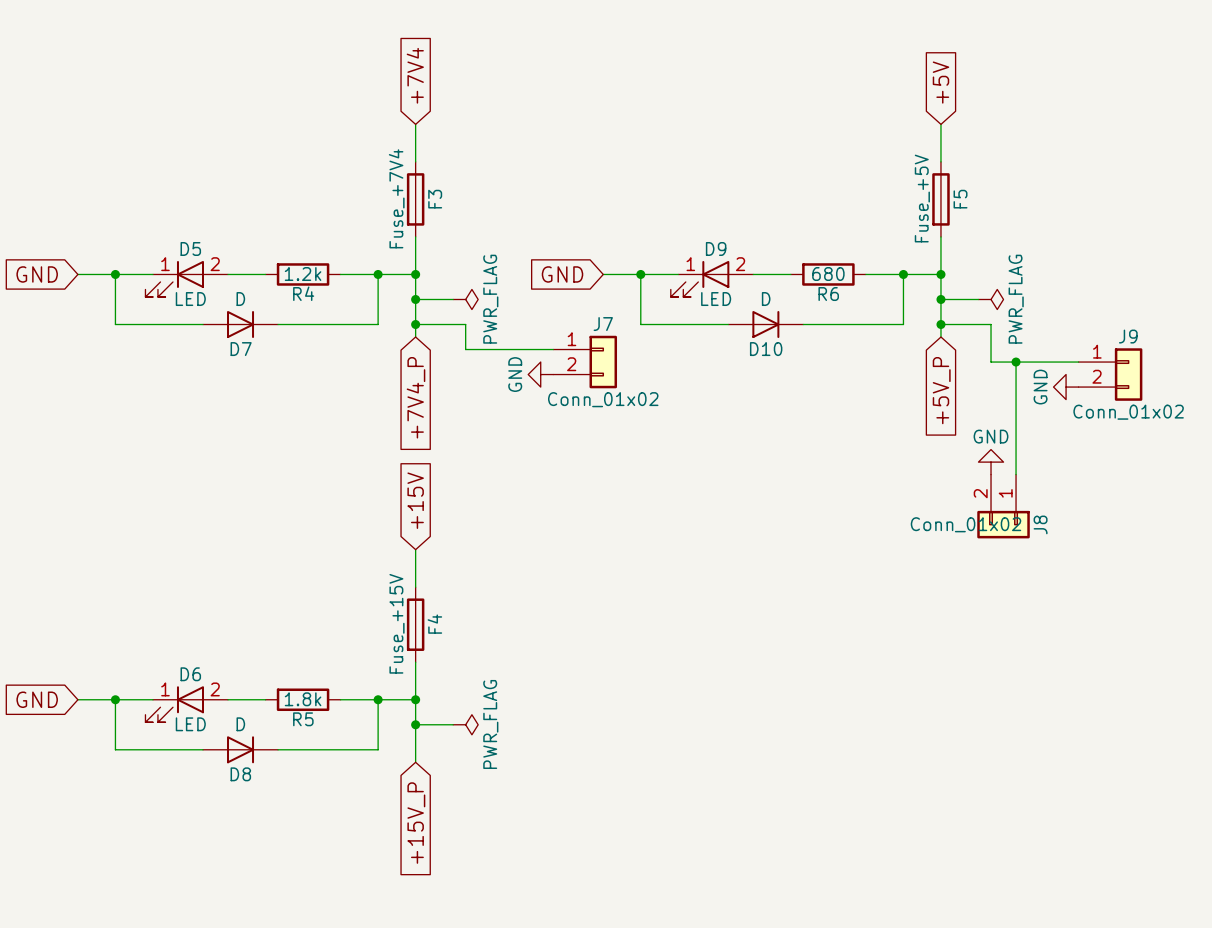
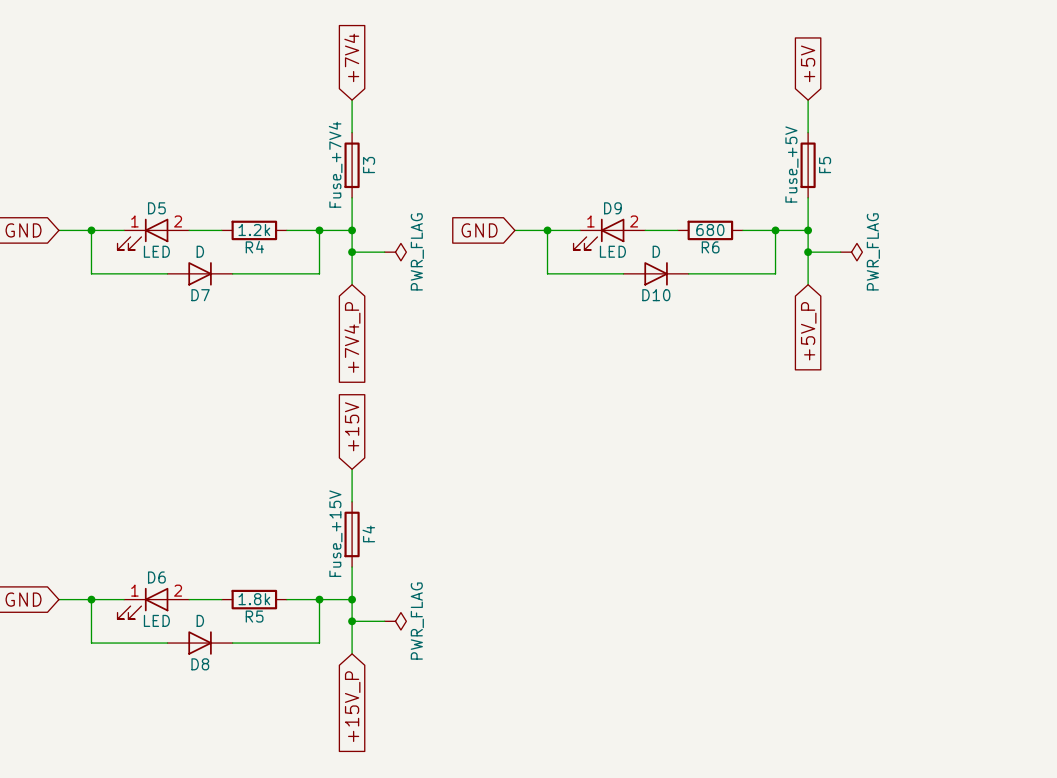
wire: (415, 324) (465, 324) (465, 349) (553, 349) -> none
junction: (415, 324) -> none
wire: (940, 324) (991, 324) (991, 362) (1078, 362) -> none
junction: (940, 324) -> none
J7: Conn_01x02 (585, 362) -> none
wire: (1016, 362) (1016, 474) -> none
junction: (1016, 362) -> none
power symbol: GND (540, 374) -> none
J9: Conn_01x02 (1110, 374) -> none
power symbol: GND (1066, 387) -> none
power symbol: GND (991, 462) -> none
J8: Conn_01x02 (1003, 506) -> none

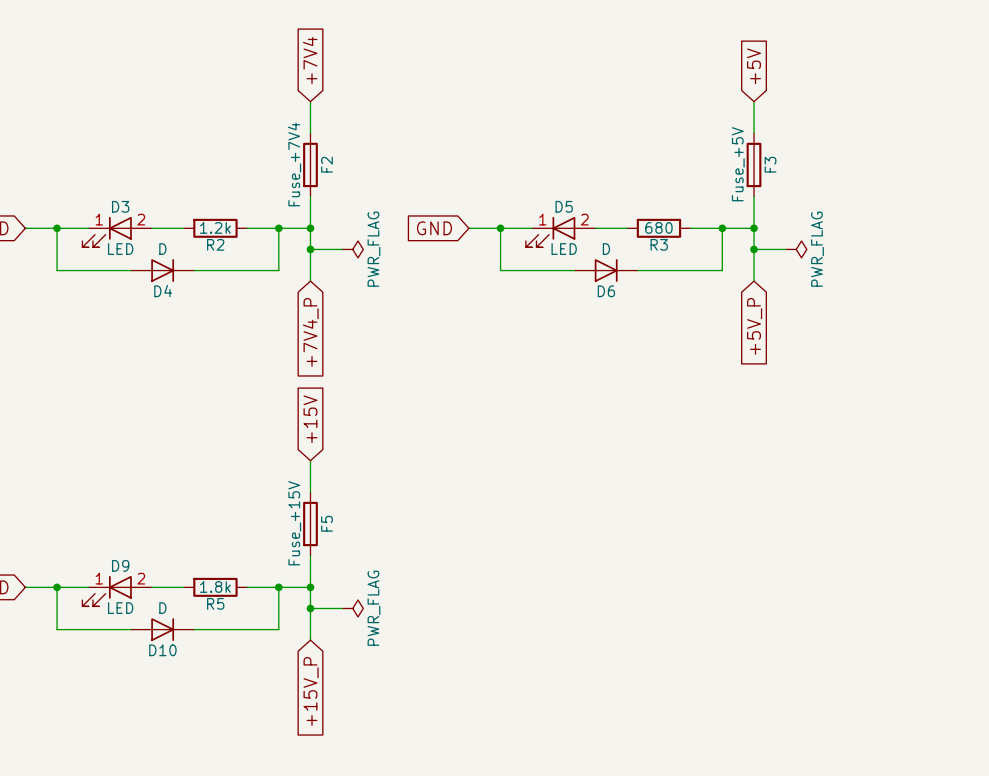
F3 name: F3 (369, 165) -> F2 (326, 164)
F5 name: F5 (825, 165) -> F3 (770, 164)
D5 name: D5 (156, 208) -> D3 (120, 206)
D9 name: D9 (612, 208) -> D5 (564, 206)
R4 name: R4 (254, 247) -> R2 (215, 244)
R6 name: R6 (710, 247) -> R3 (659, 244)
D7 name: D7 (200, 295) -> D4 (163, 291)
D10 name: D10 (656, 295) -> D6 (606, 291)
F4 name: F4 (368, 533) -> F5 (326, 523)
D6 name: D6 (156, 577) -> D9 (120, 565)
D8 name: D8 (200, 664) -> D10 (162, 650)

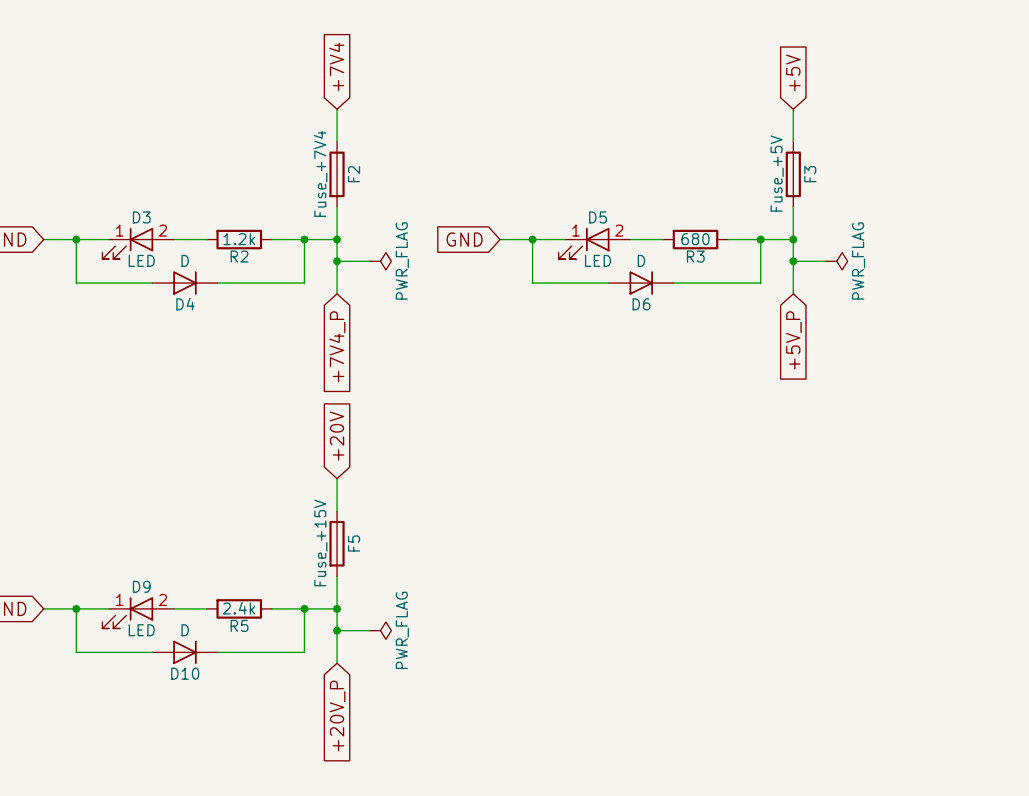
global label: +15V (310, 419) -> +20V (337, 436)
R5 value: 1.8k (215, 586) -> 2.4k (239, 608)
global label: +15V_P (311, 691) -> +20V_P (337, 716)

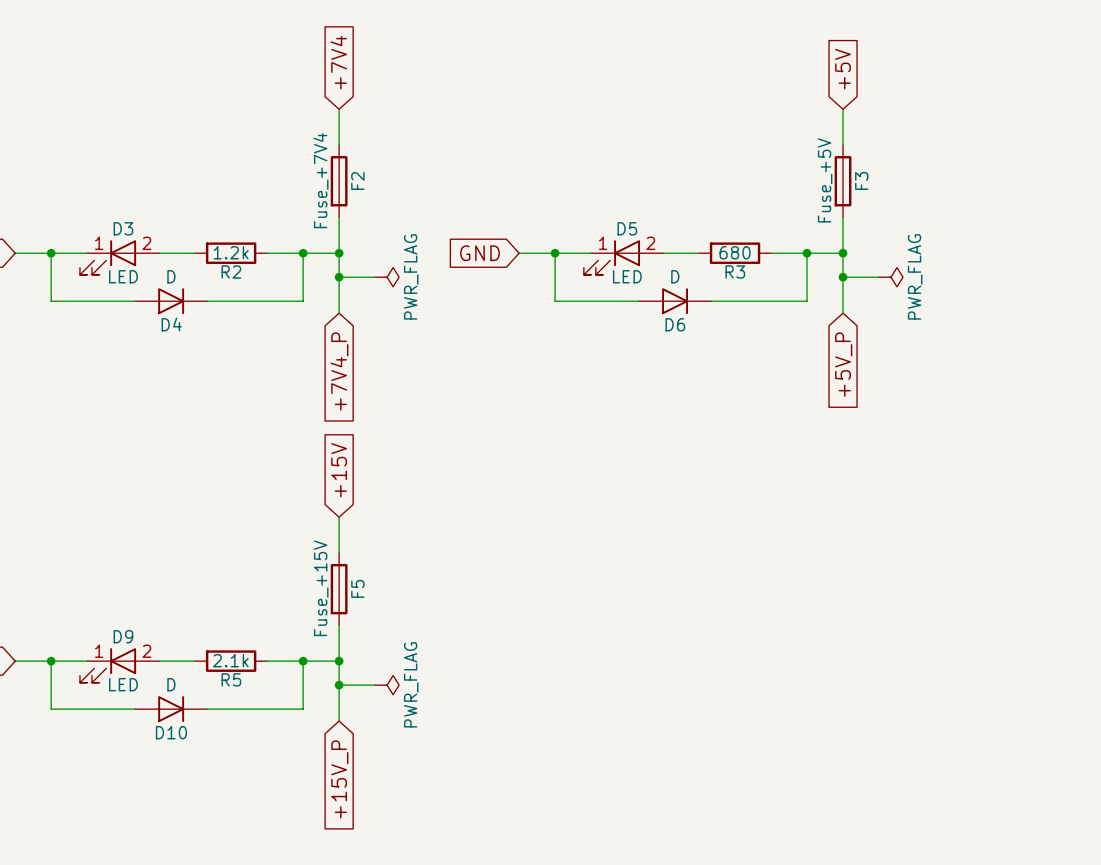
global label: +20V (337, 436) -> +15V (339, 470)
R5 value: 2.4k (239, 608) -> 2.1k (230, 660)
global label: +20V_P (337, 716) -> +15V_P (339, 779)

